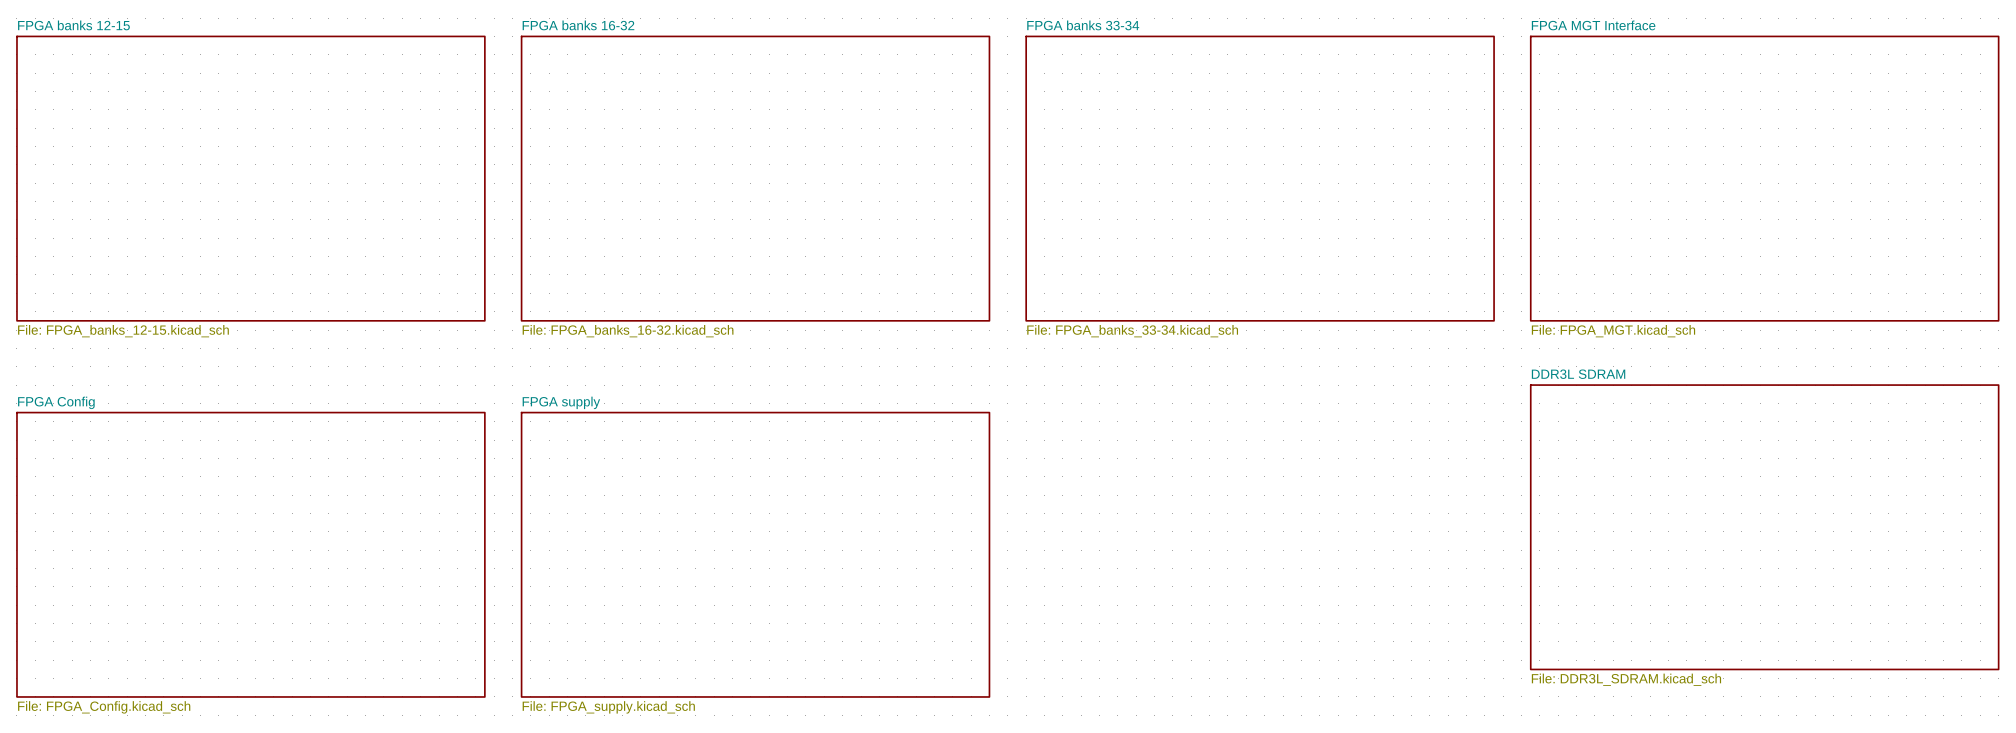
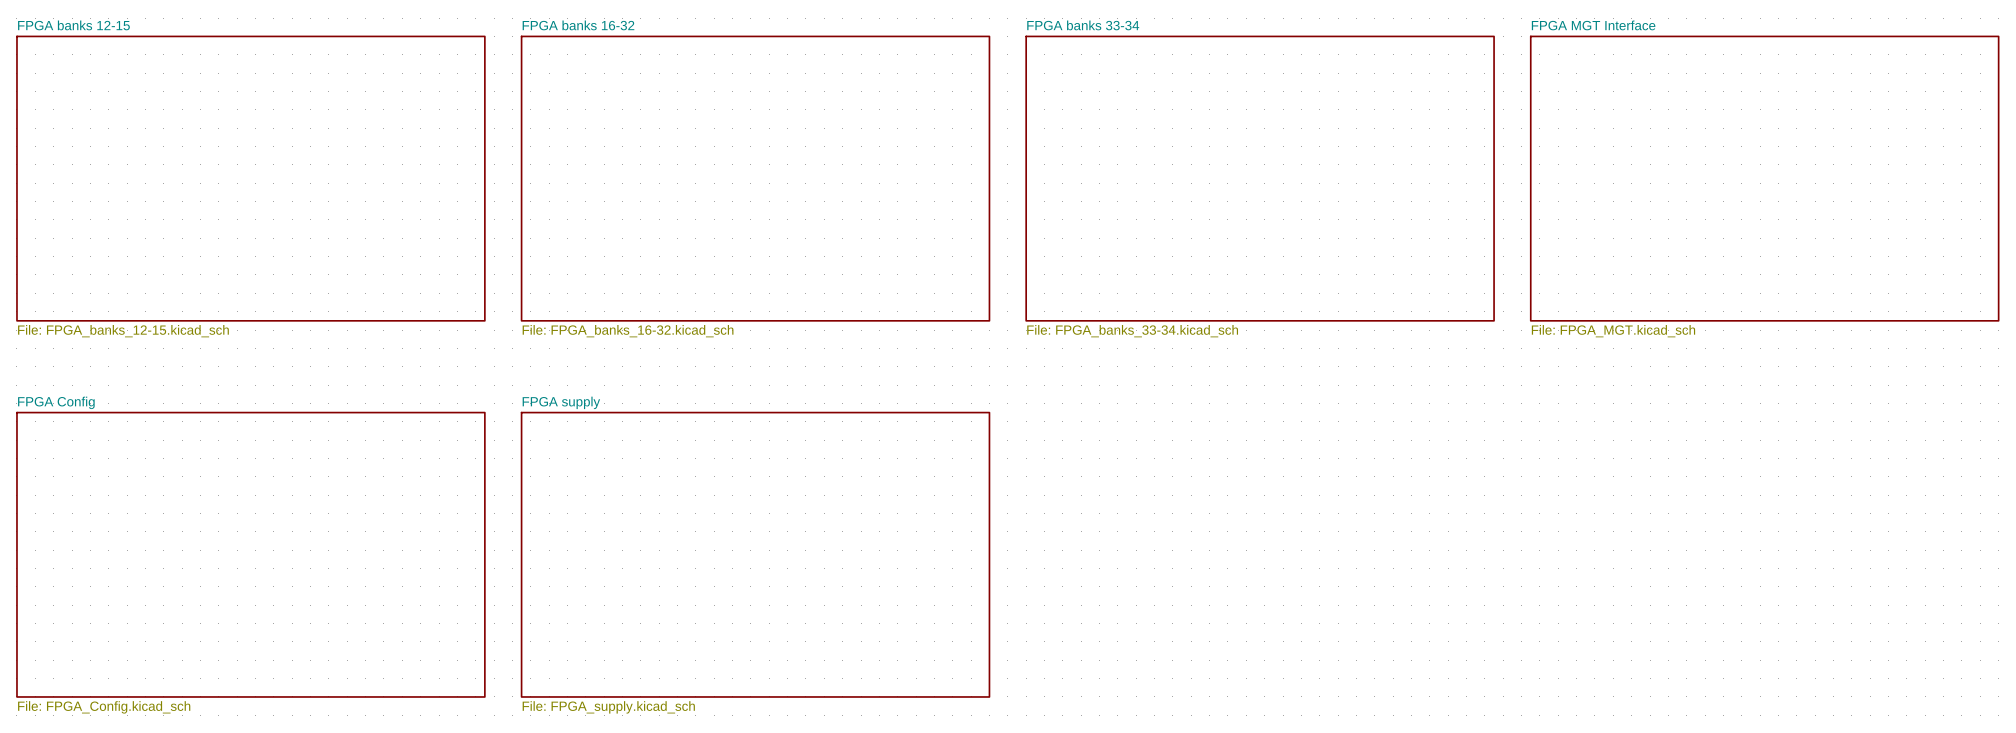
sheet DDR3L SDRAM: File: DDR3L_SDRAM.kicad_sch (1764, 527) -> none

